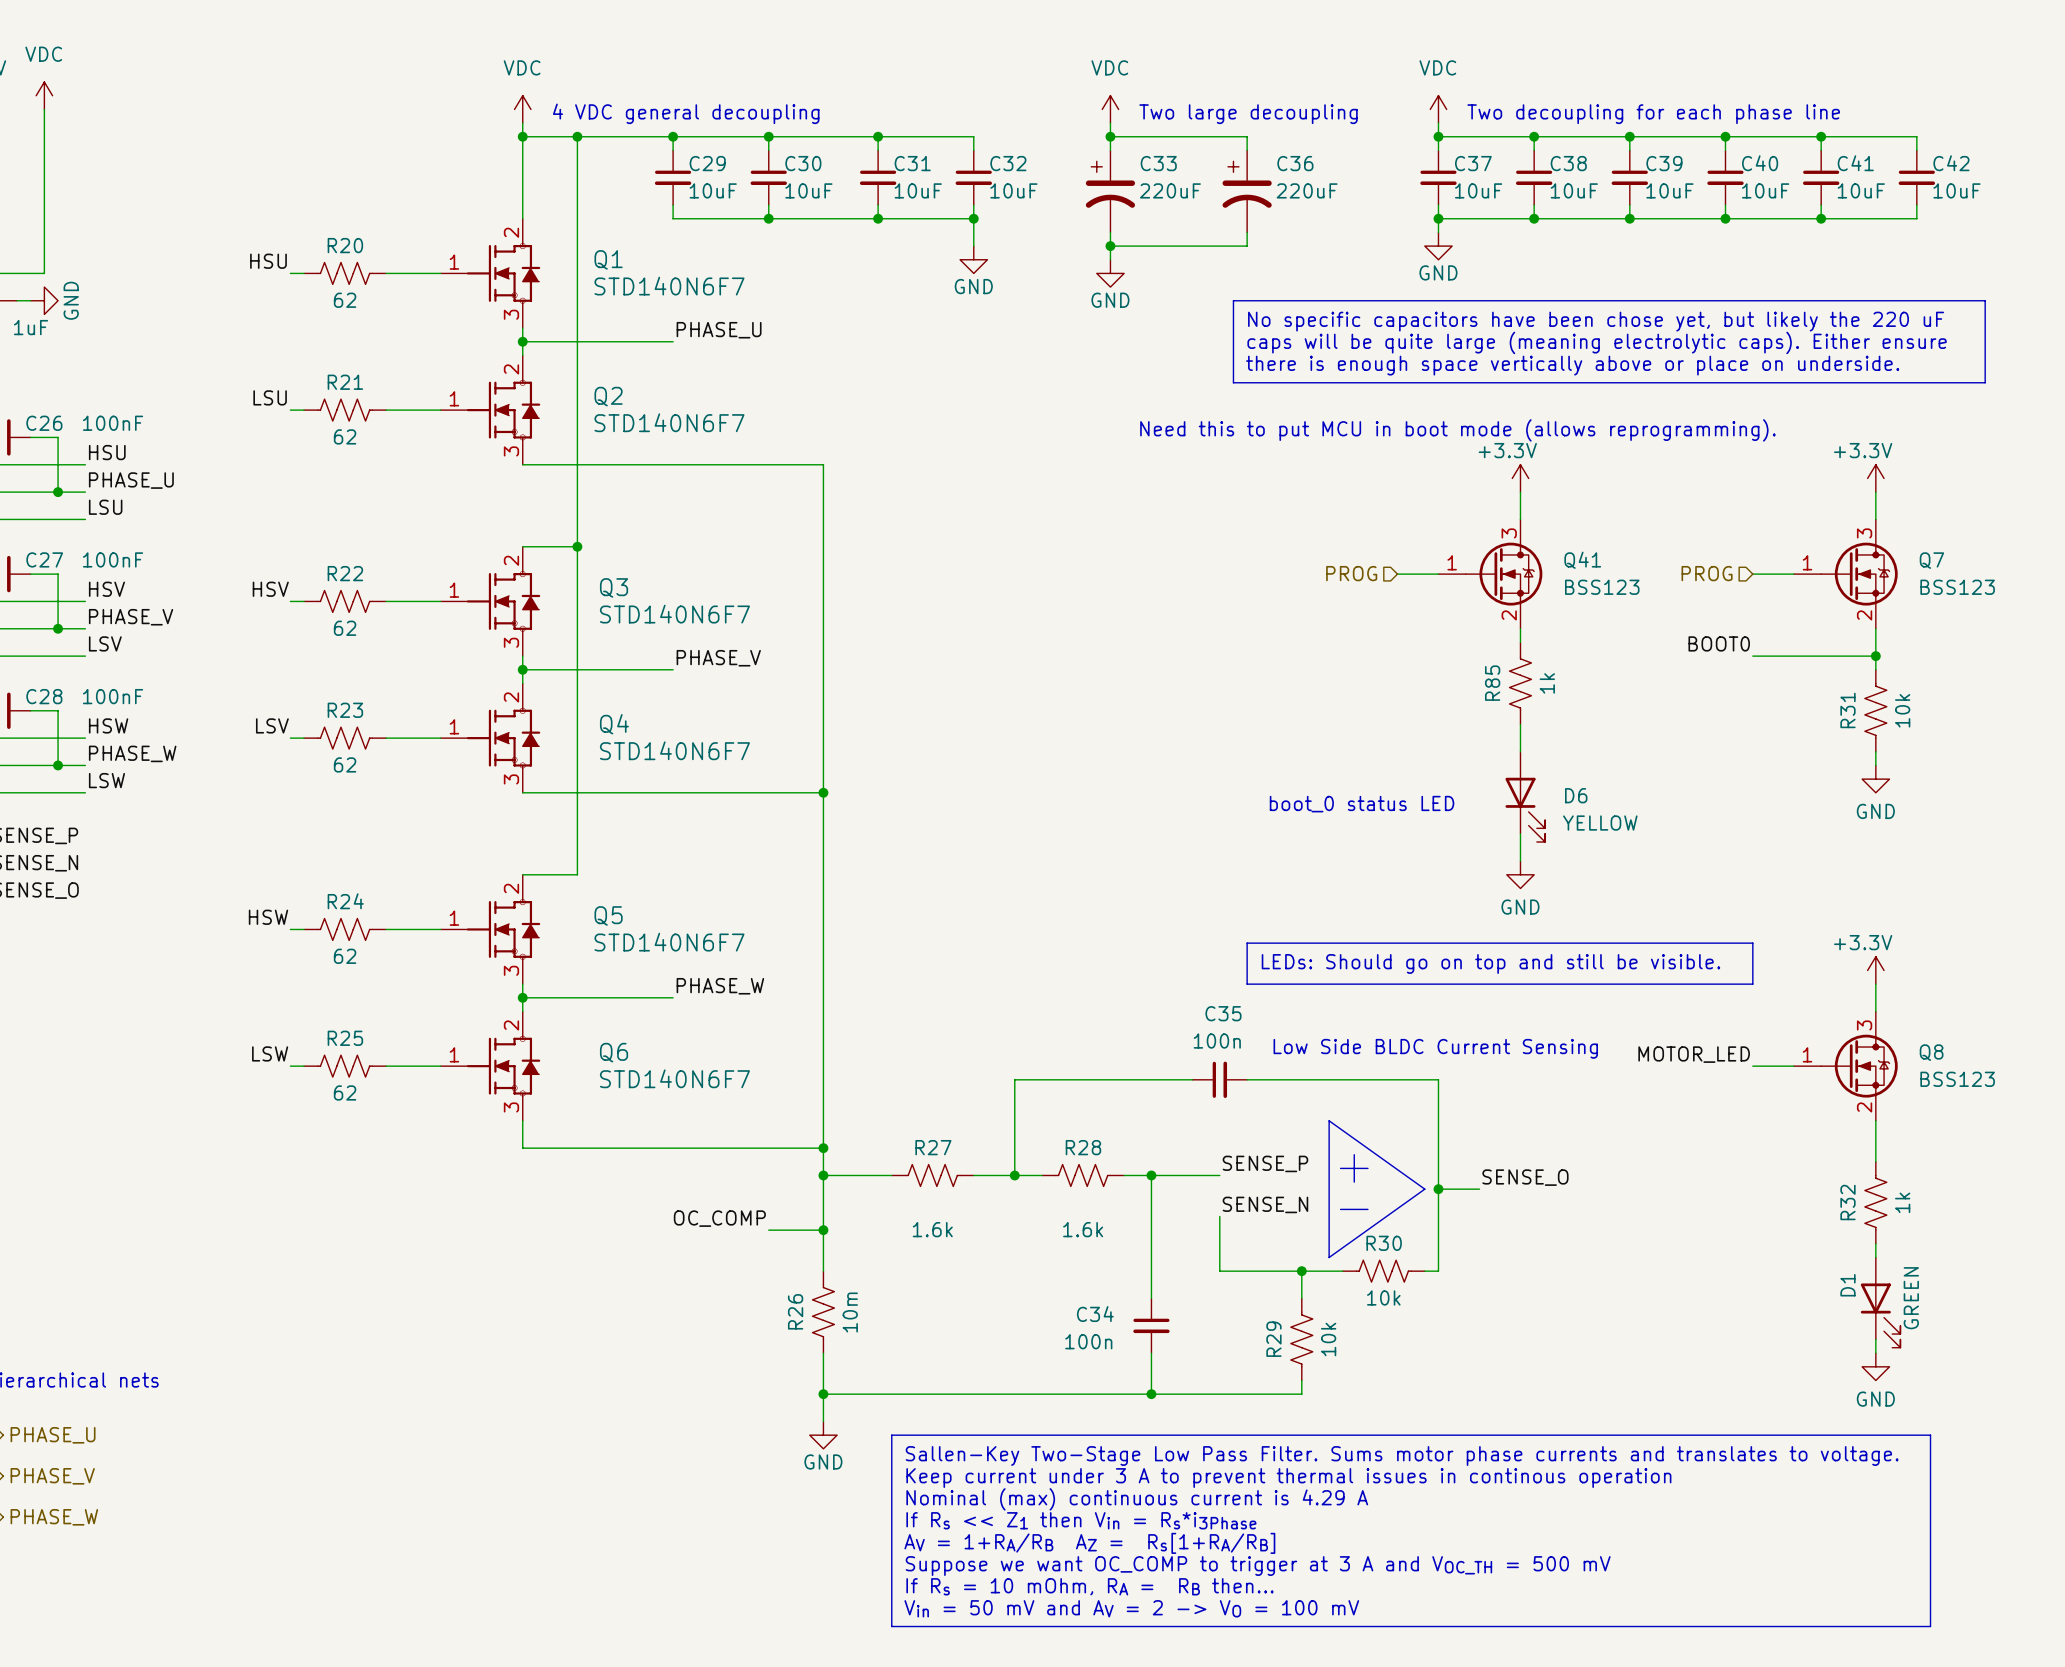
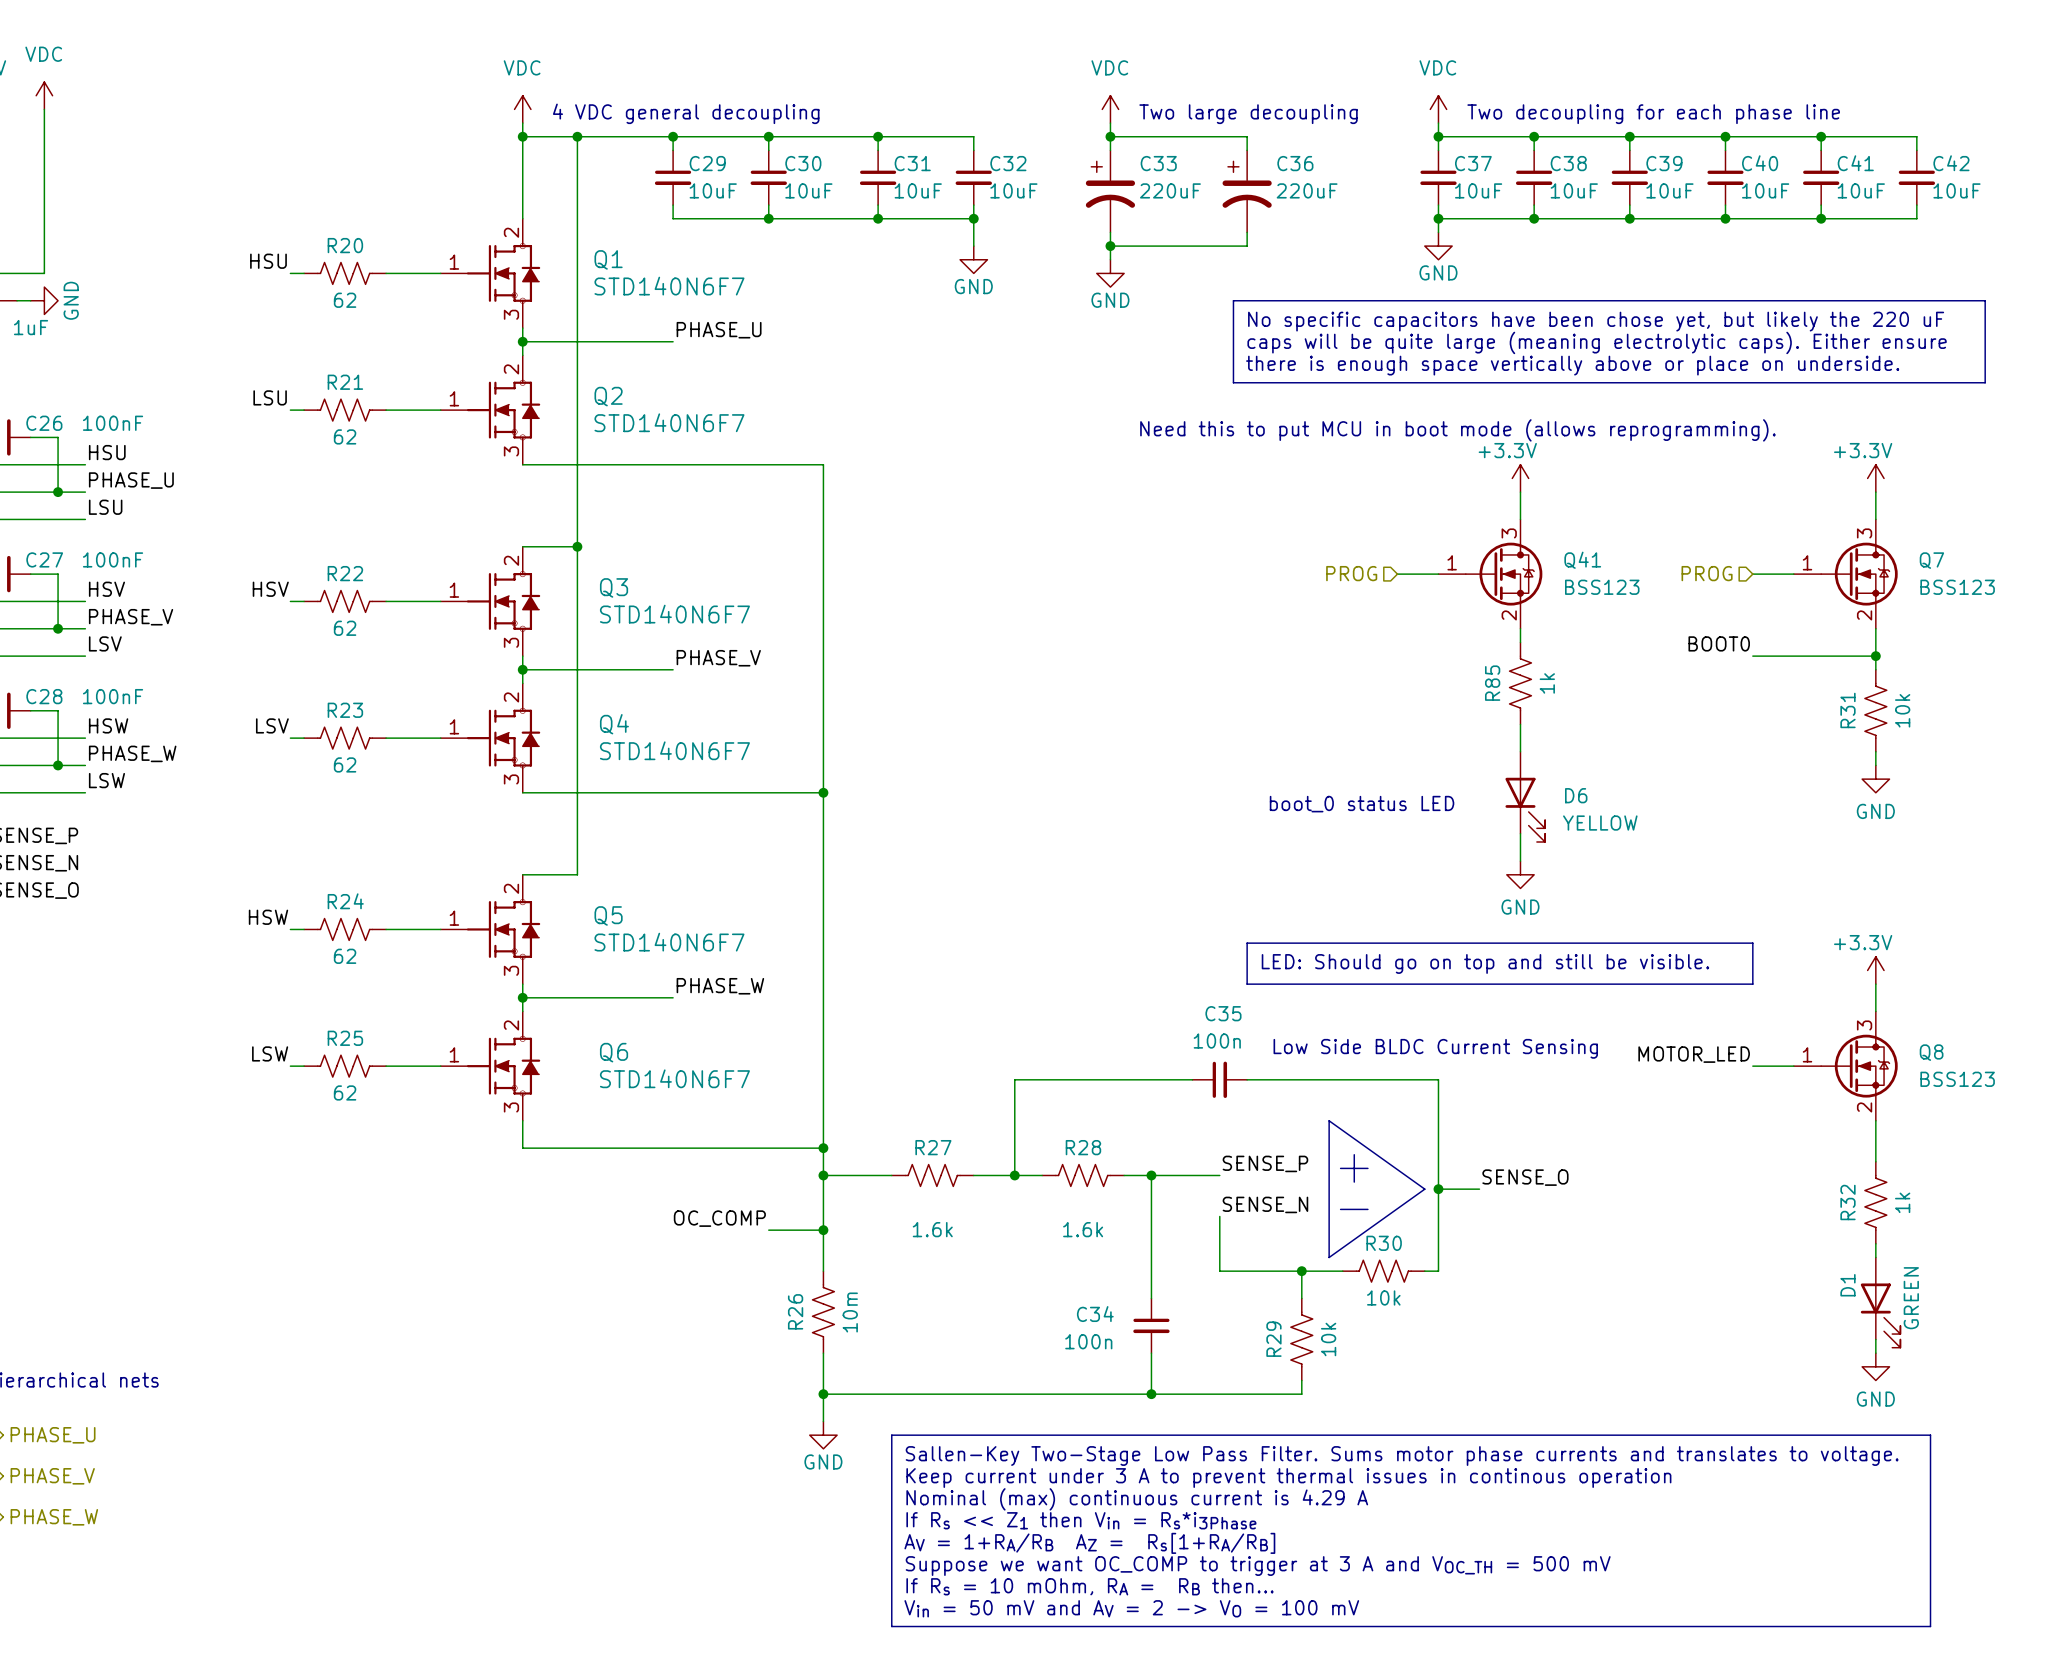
text: LEDs: Should go on top and still be visible. (1490, 963) -> LED: Should go on top and still be visible. (1485, 963)

